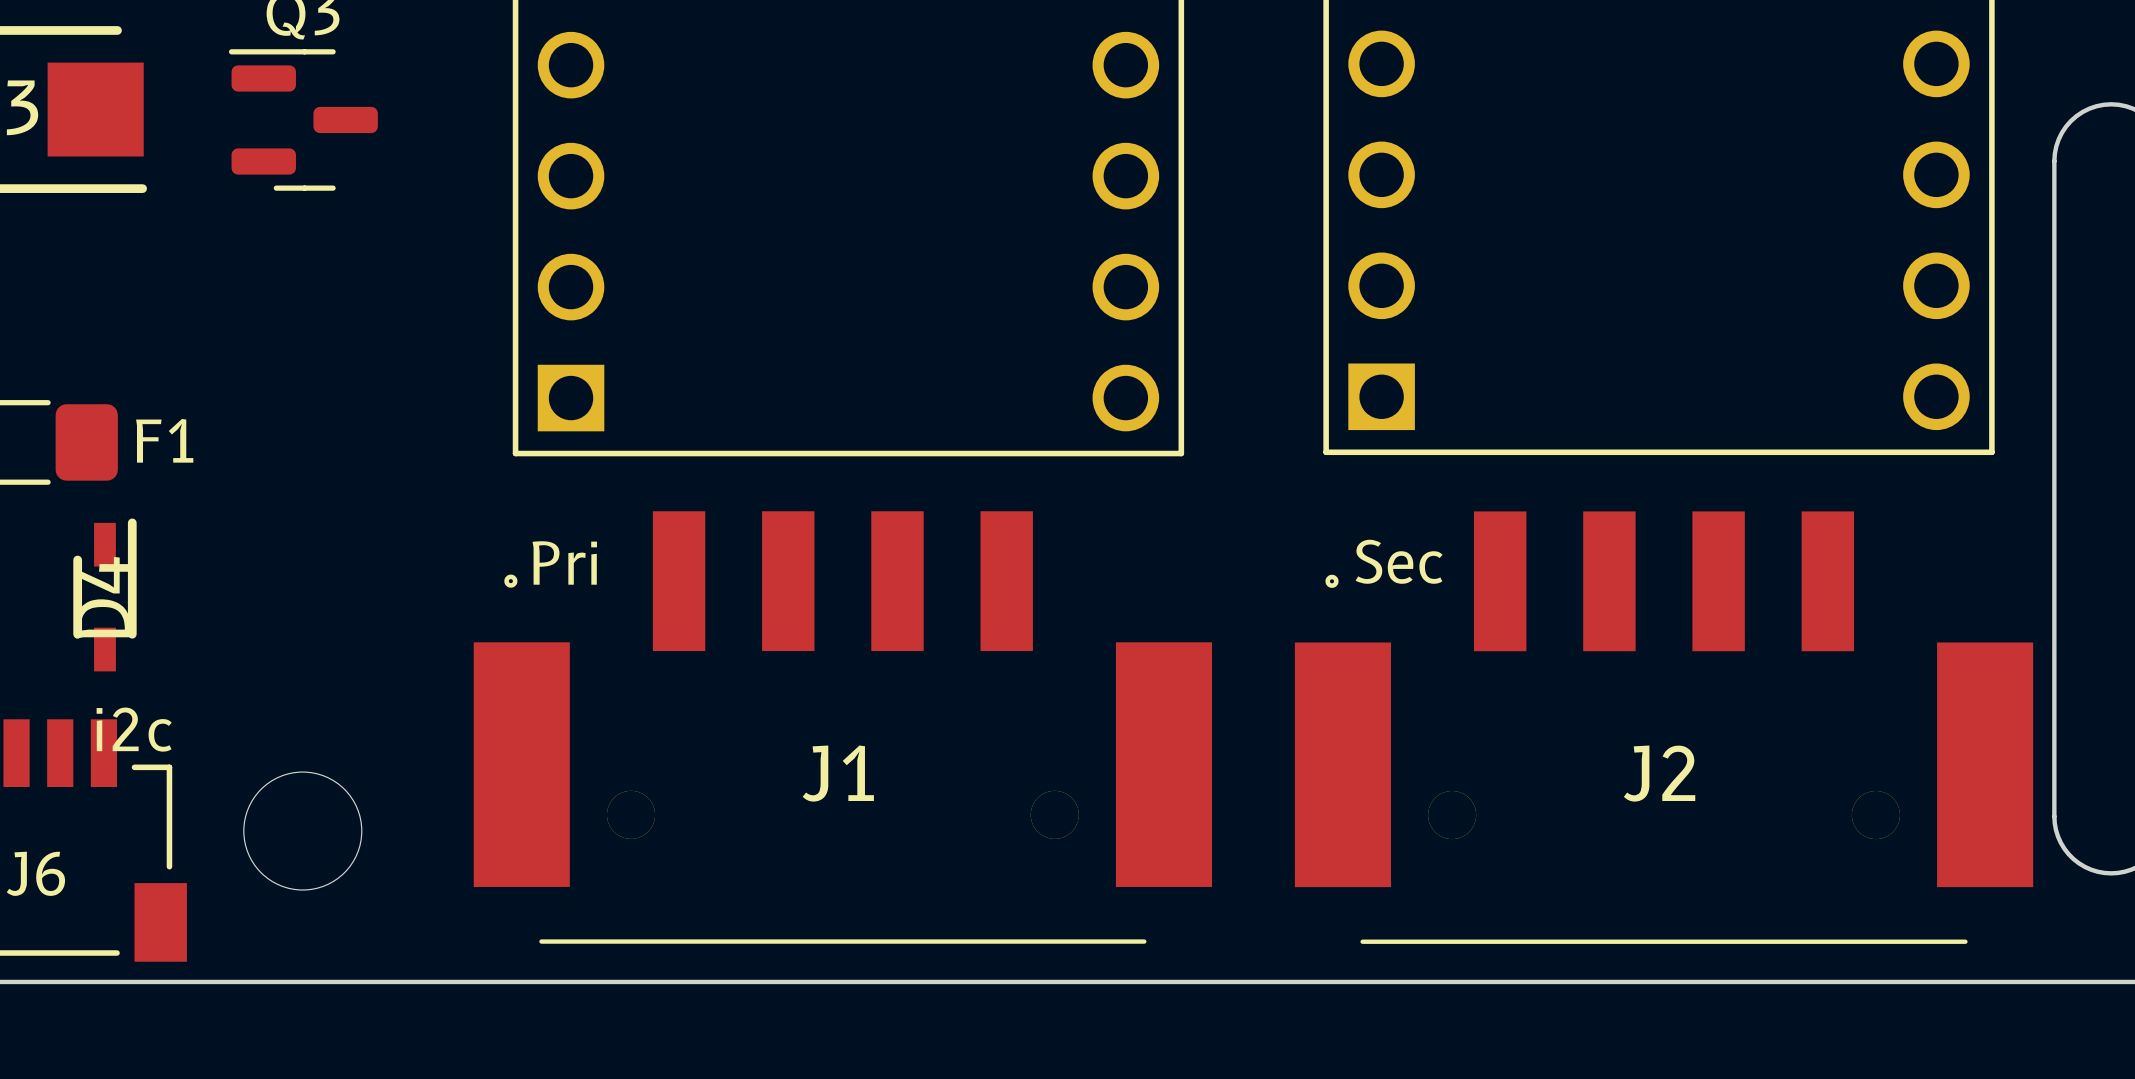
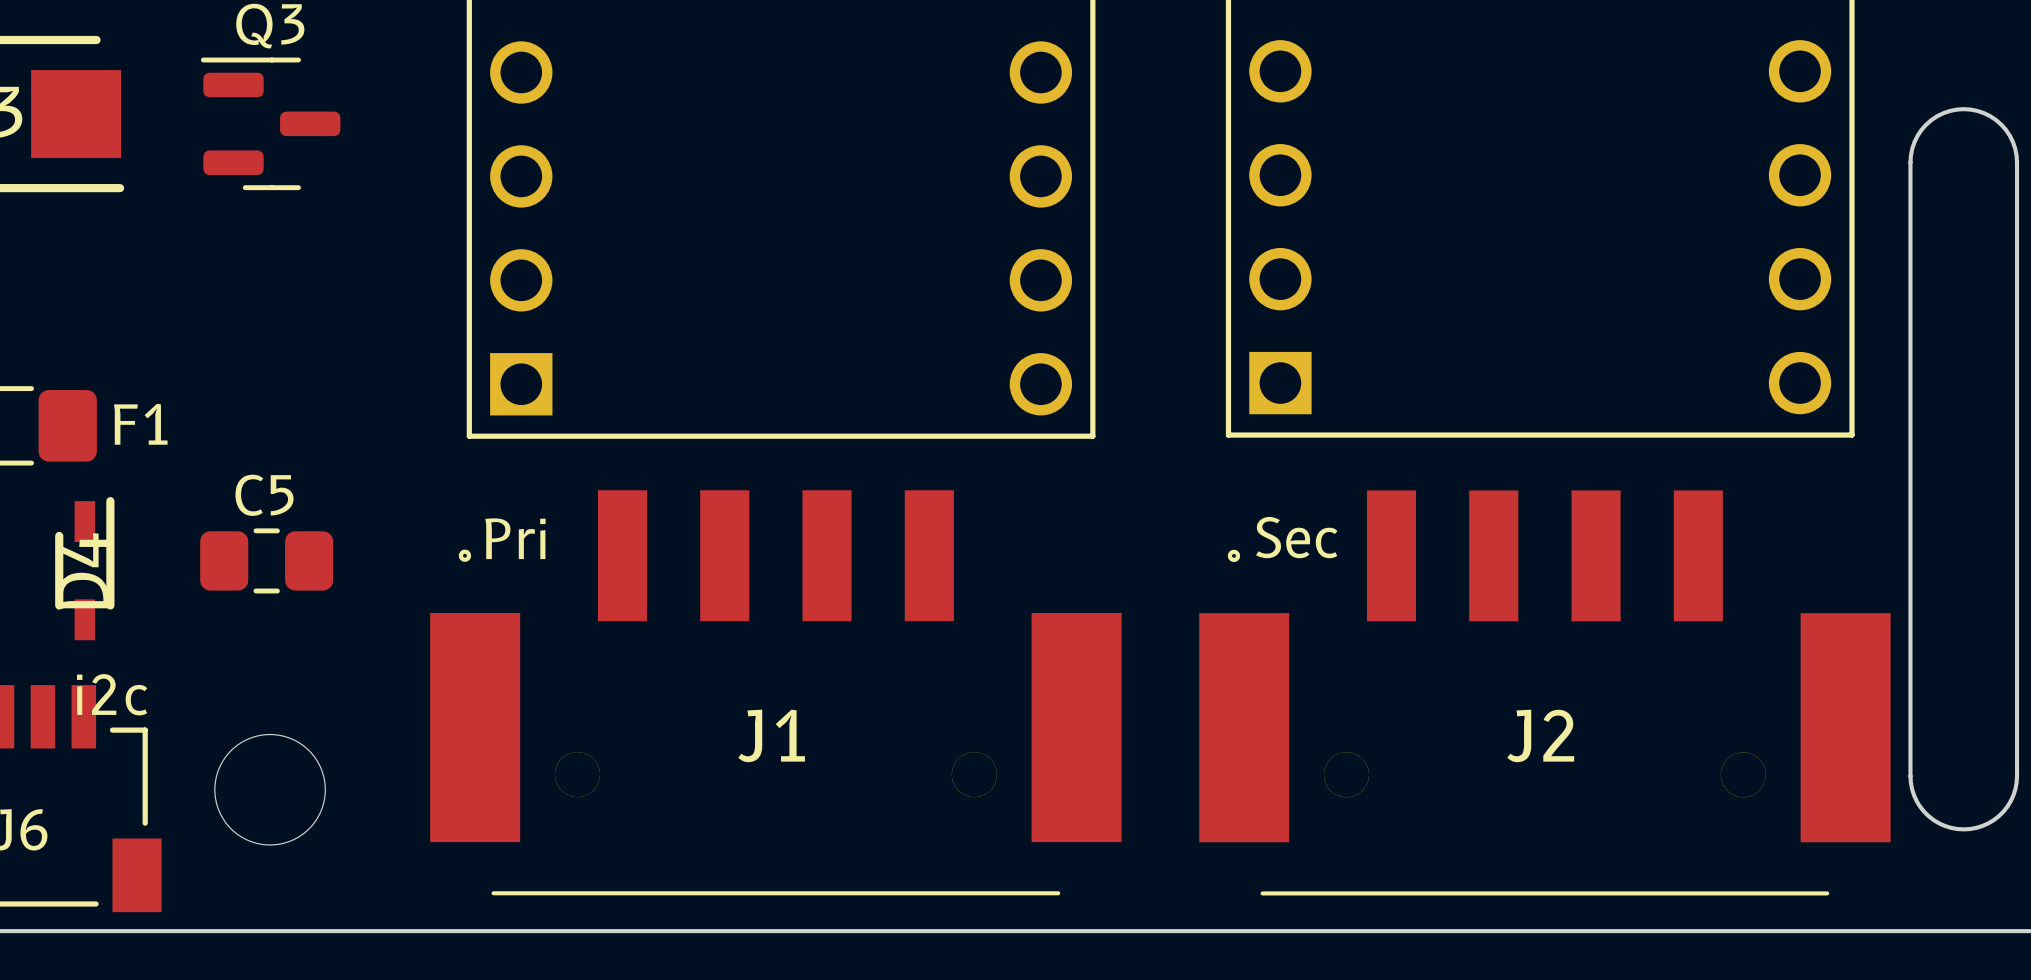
C5: none -> (266, 560)

